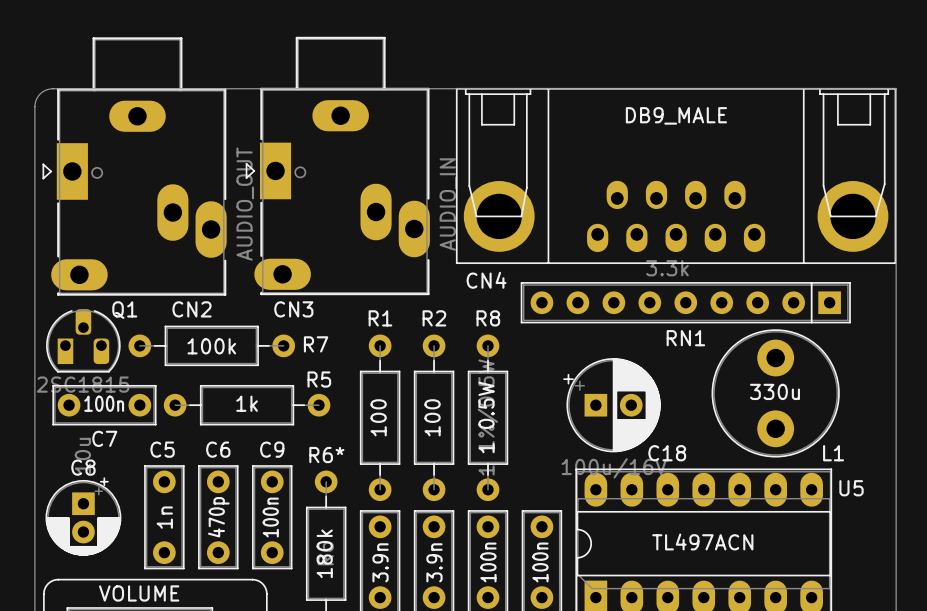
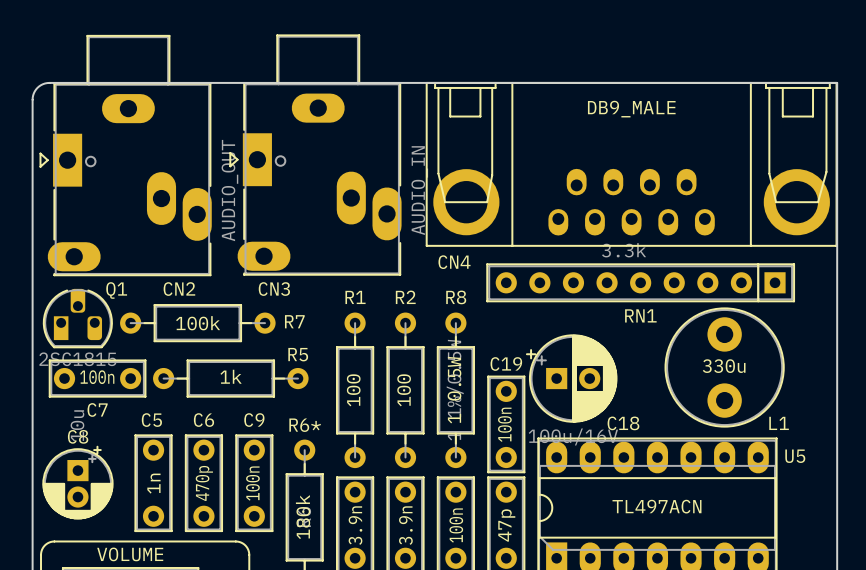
C19: none -> 100n (506, 424)
part value: 100n (540, 562) -> 47p (506, 525)

